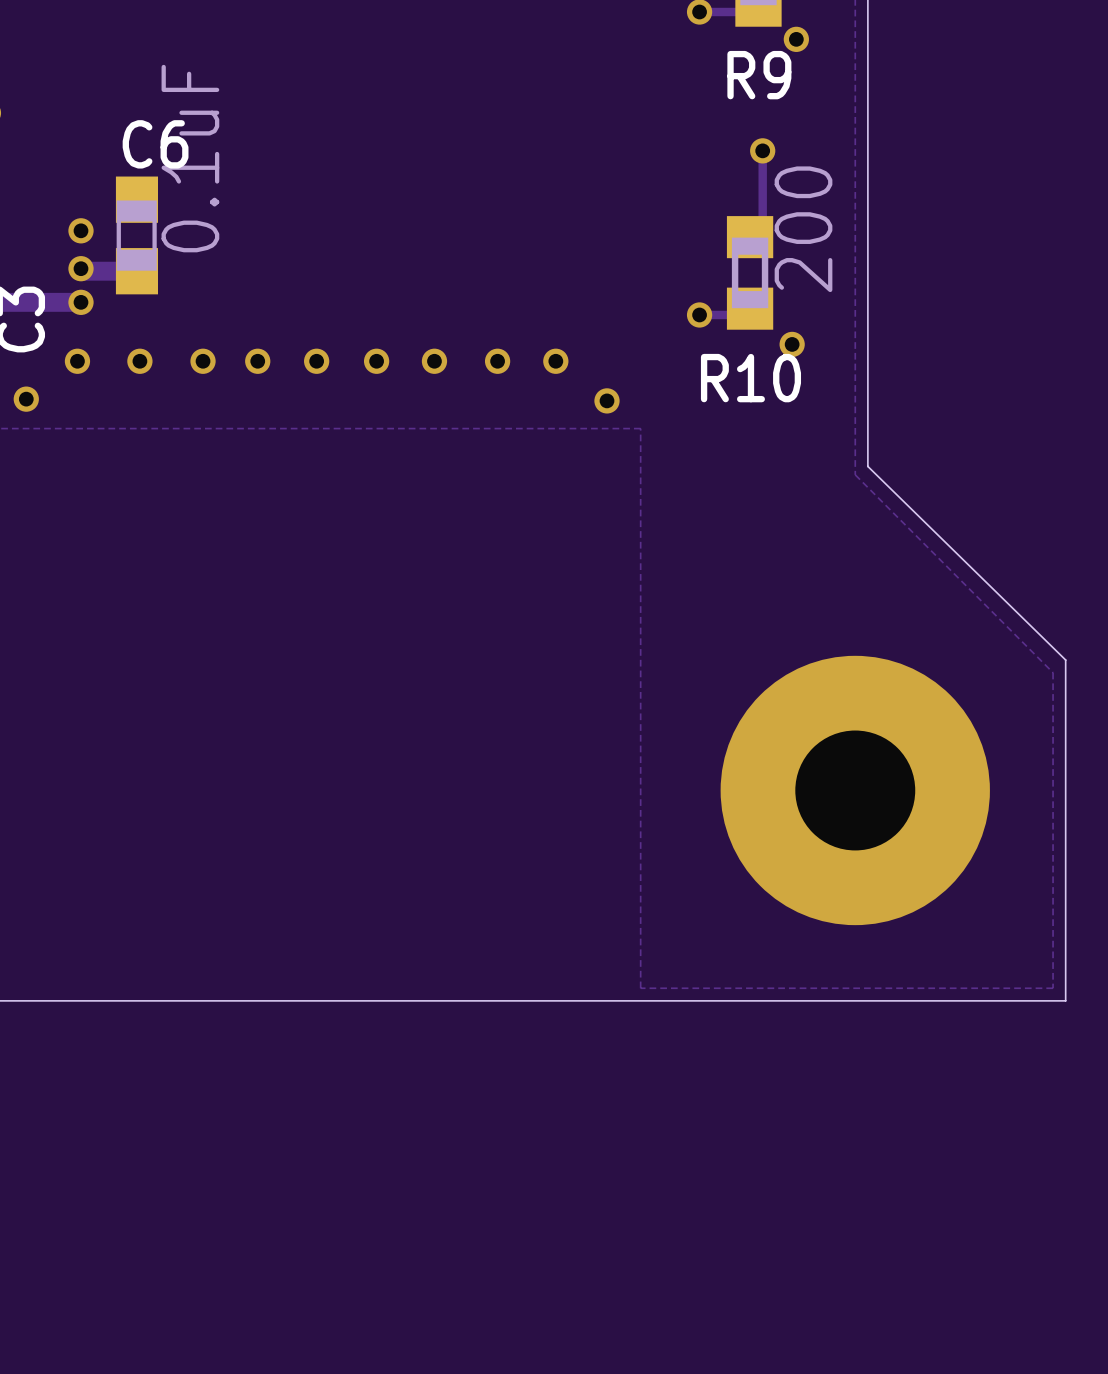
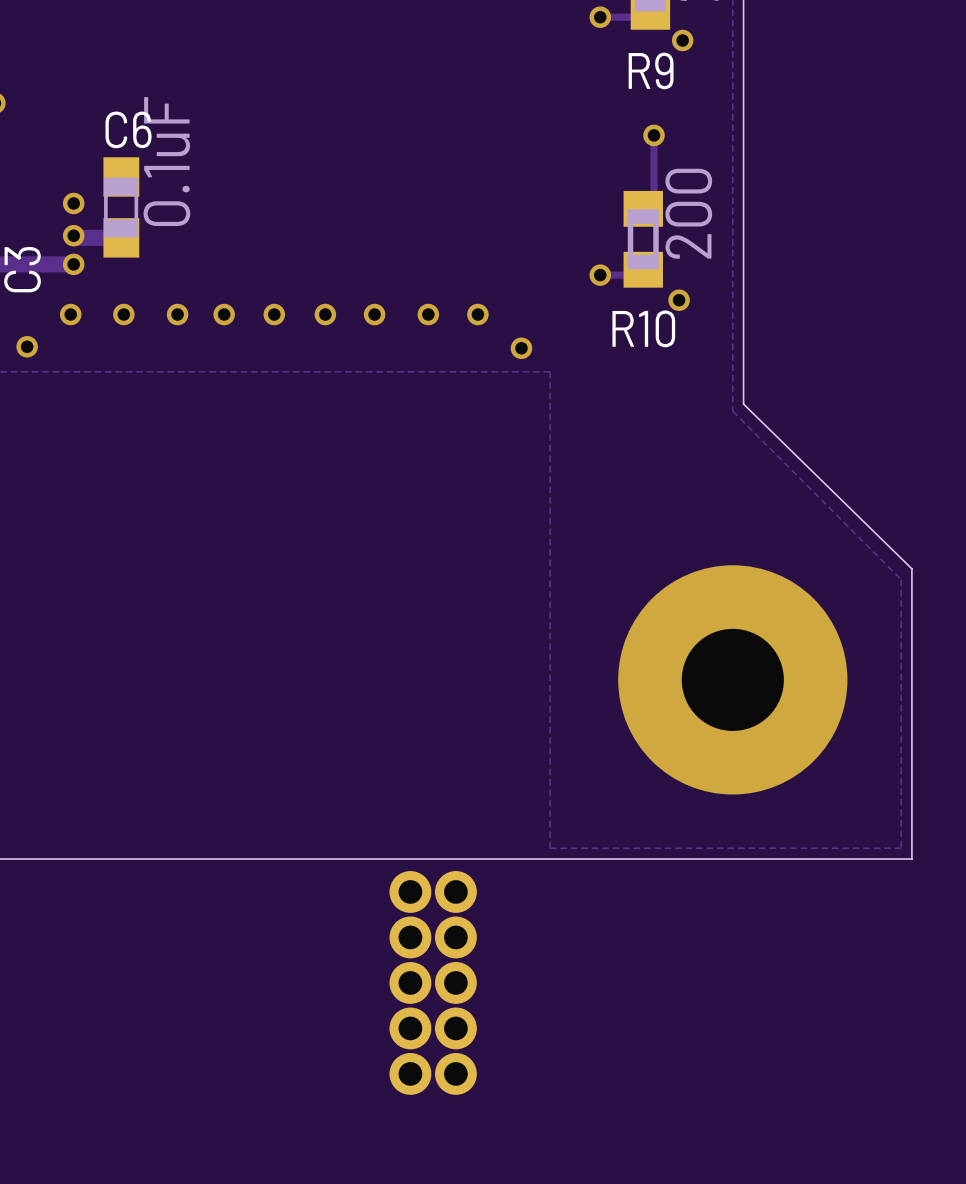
part: none -> (433, 982)

